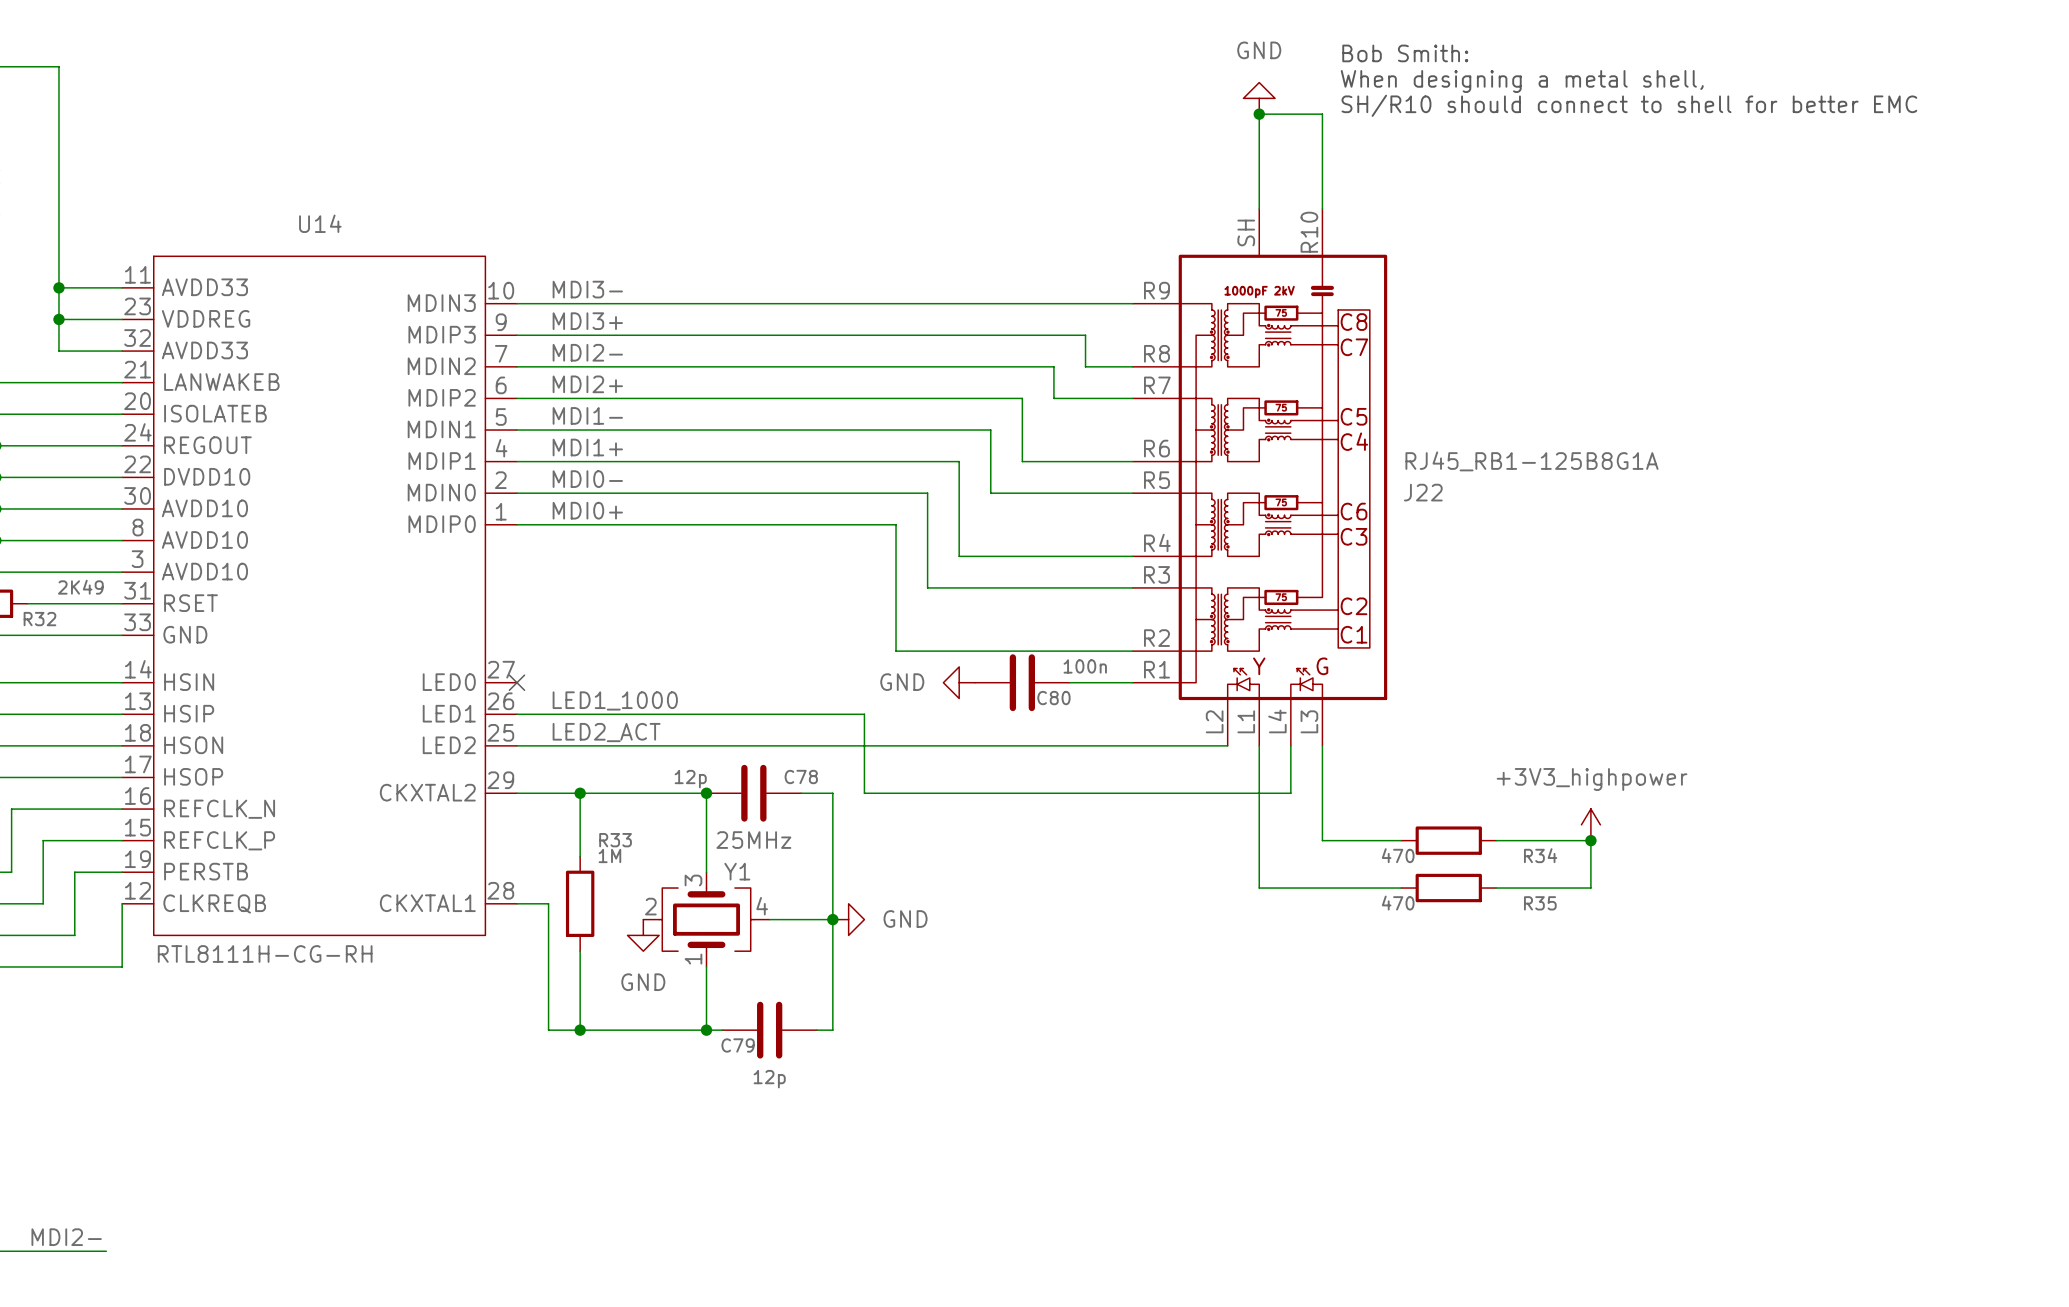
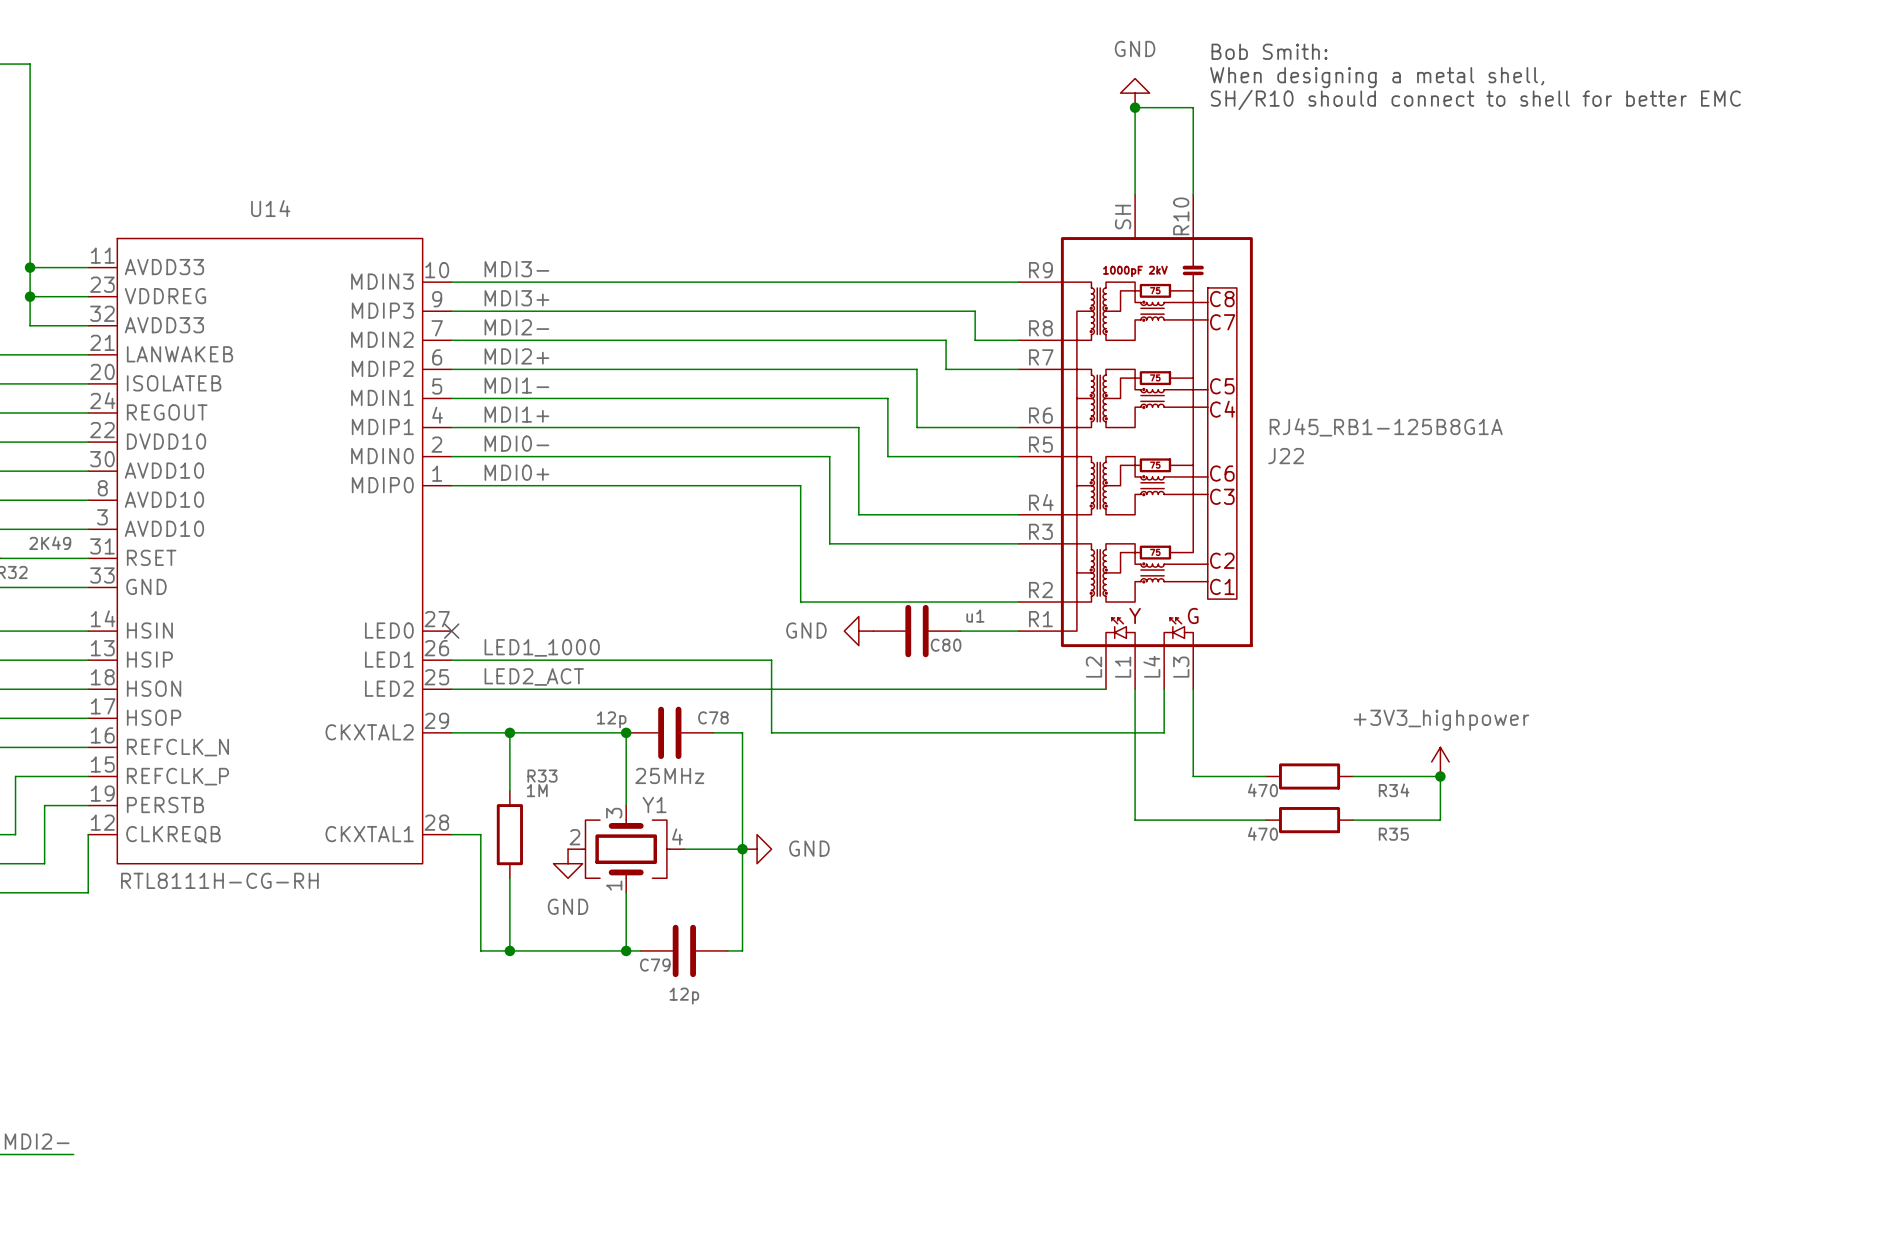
C80 value: 100n (1085, 666) -> u1 (975, 616)

